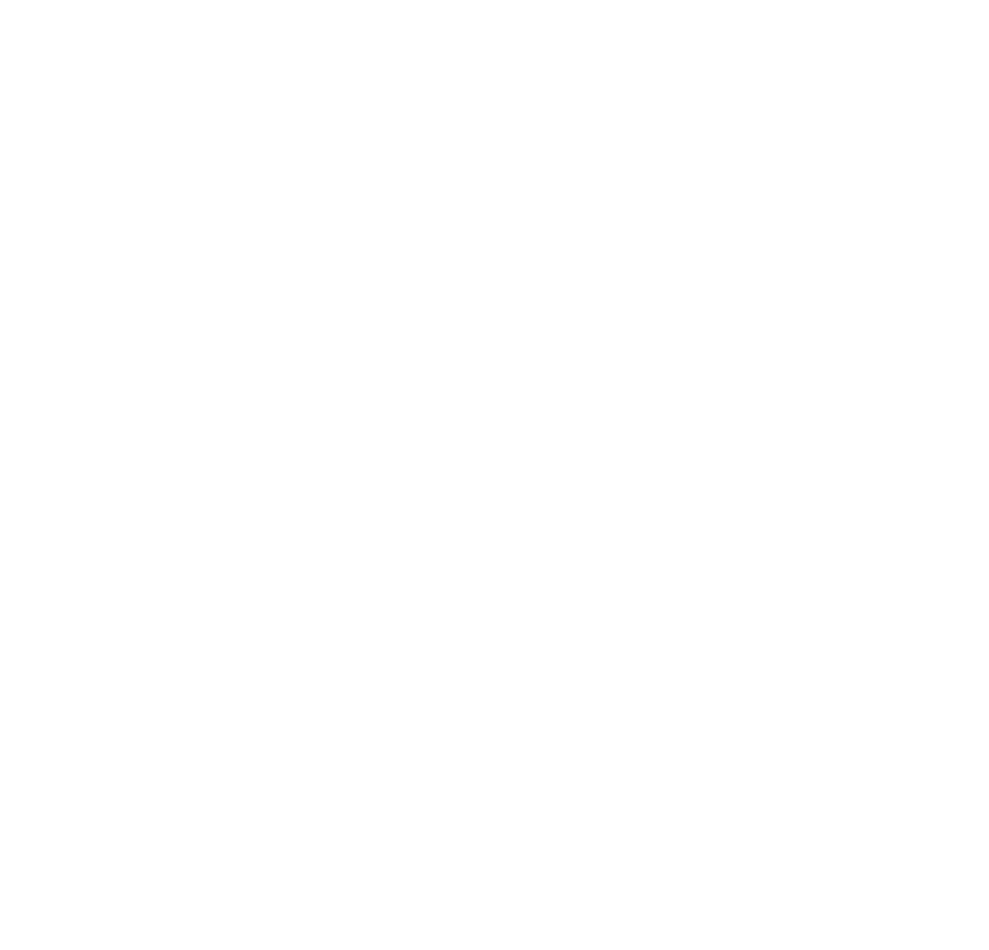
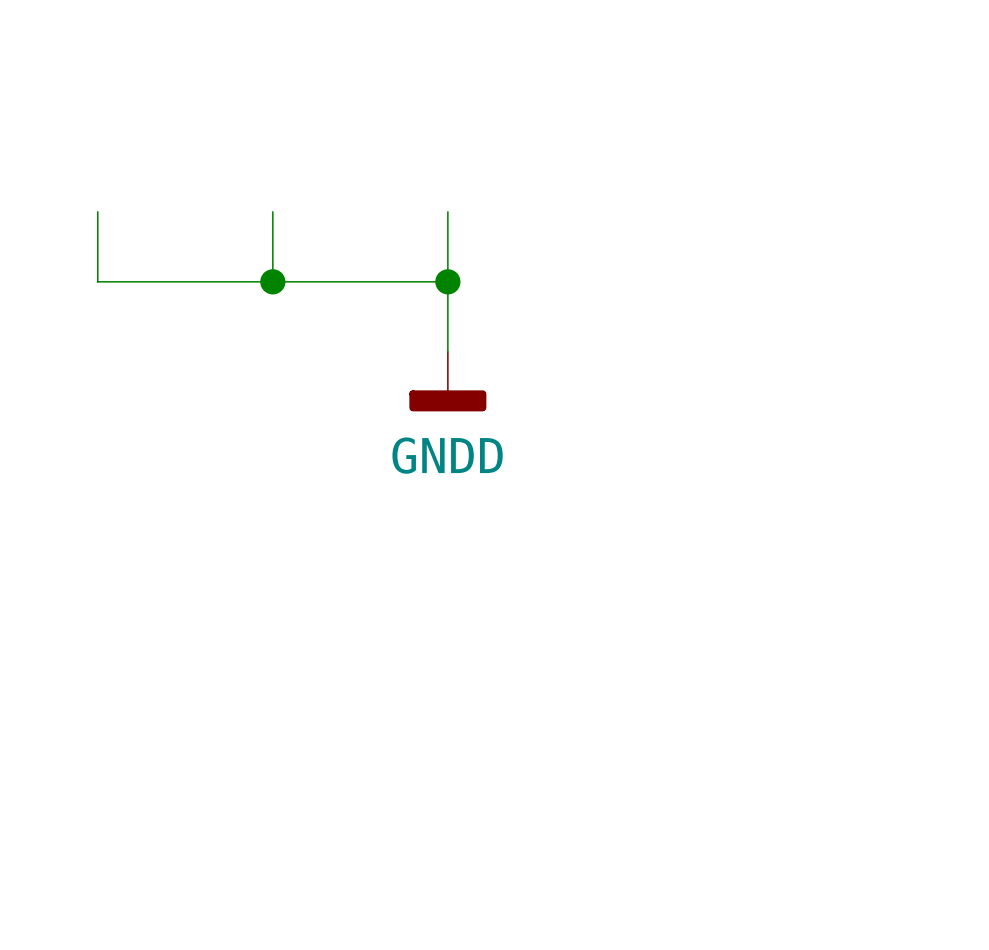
wire: none -> (97, 211) (97, 281) (447, 281)
wire: none -> (272, 211) (272, 281)
wire: none -> (447, 211) (447, 351)
junction: none -> (272, 281)
junction: none -> (447, 281)
power symbol: none -> GNDD (447, 381)

